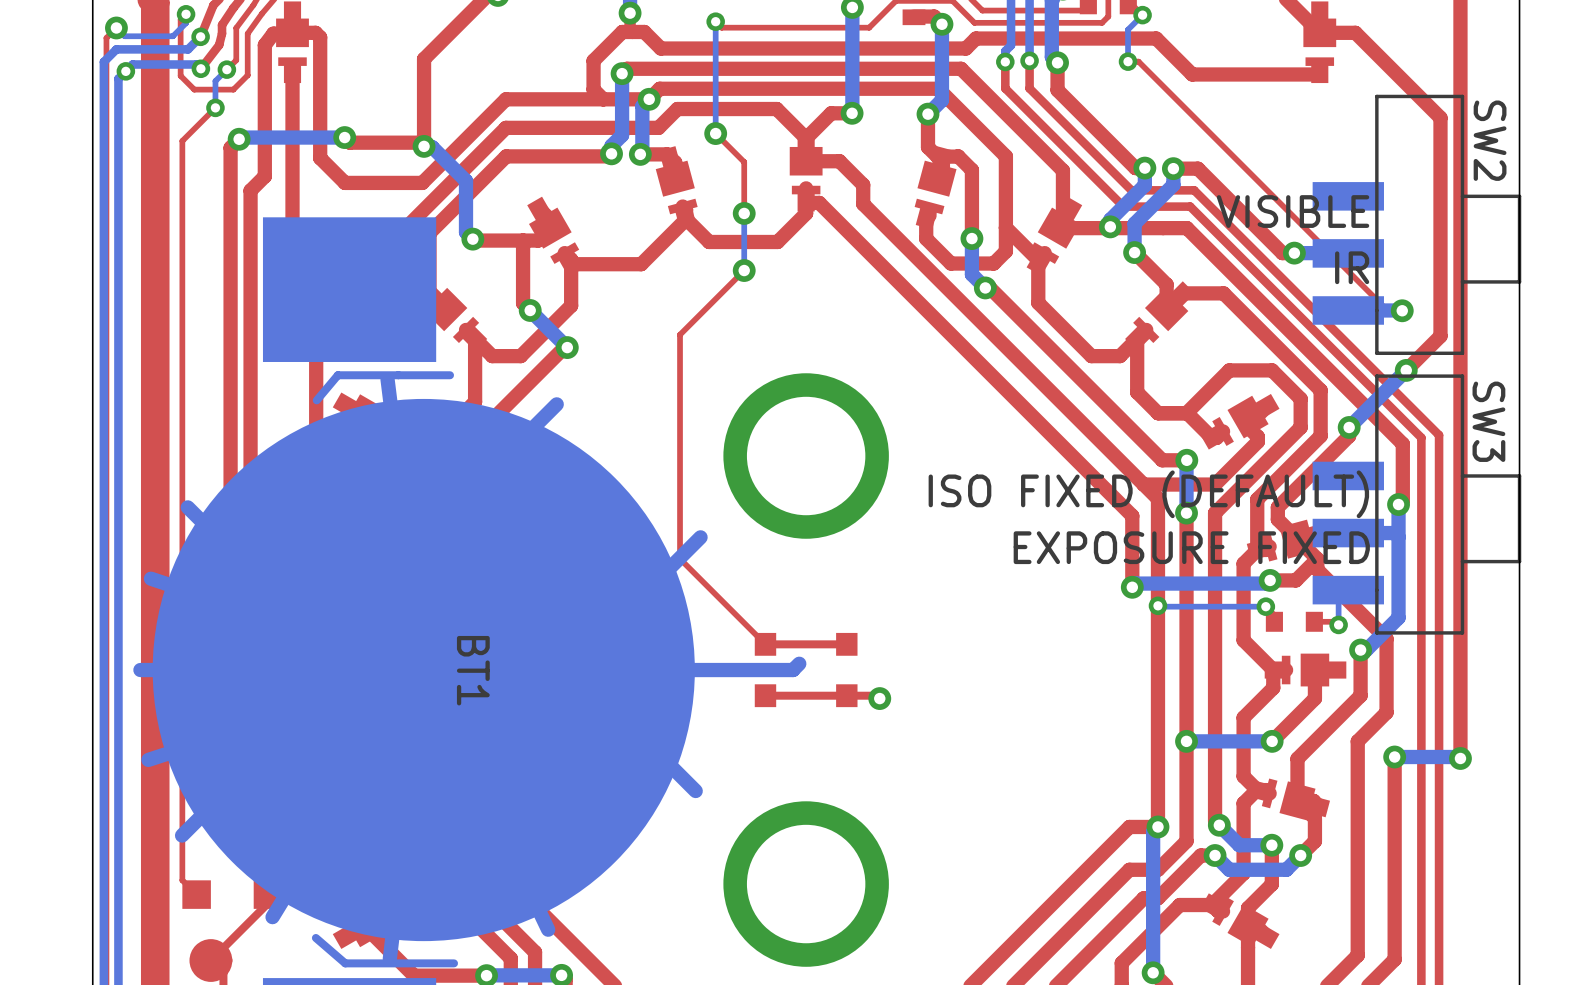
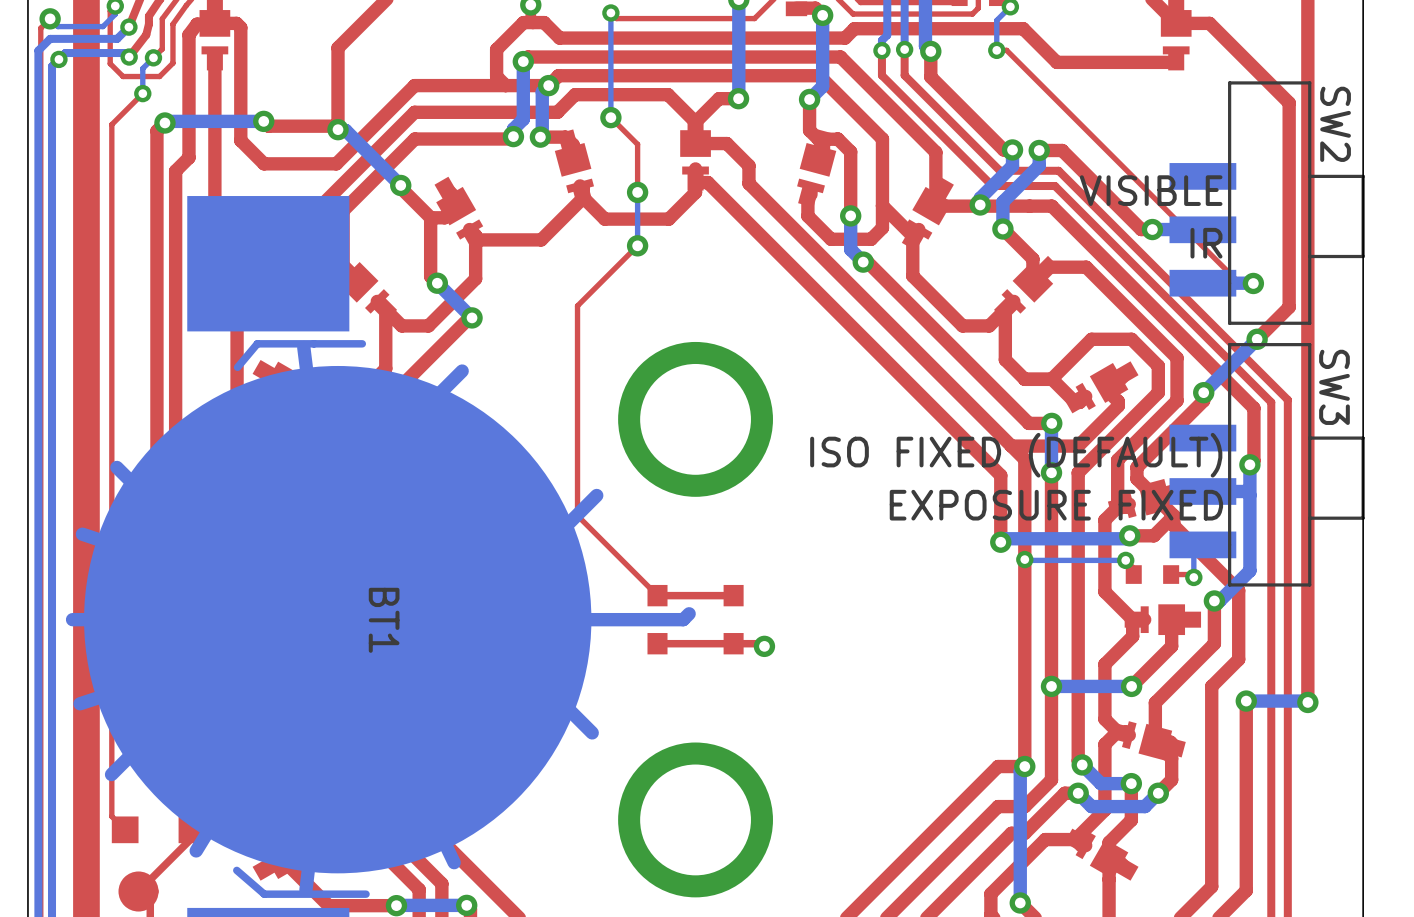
bottom track: (466, 180) (466, 232) (472, 239) -> (377, 161) (400, 185)
top track: (472, 239) (523, 240) -> (400, 185) (400, 187) (430, 217)
via position: (472, 239) -> (400, 185)

